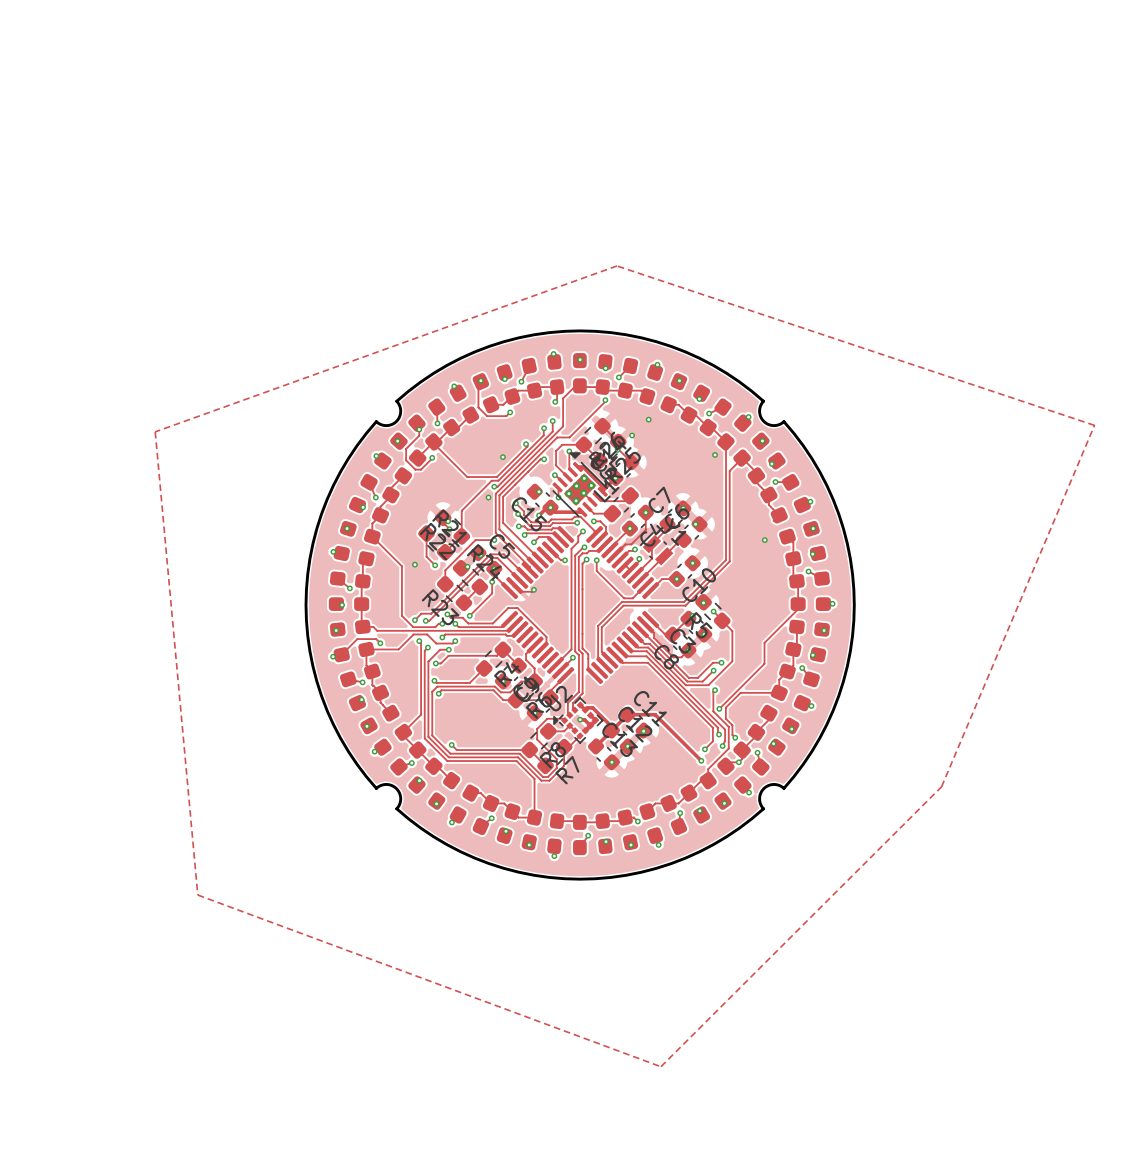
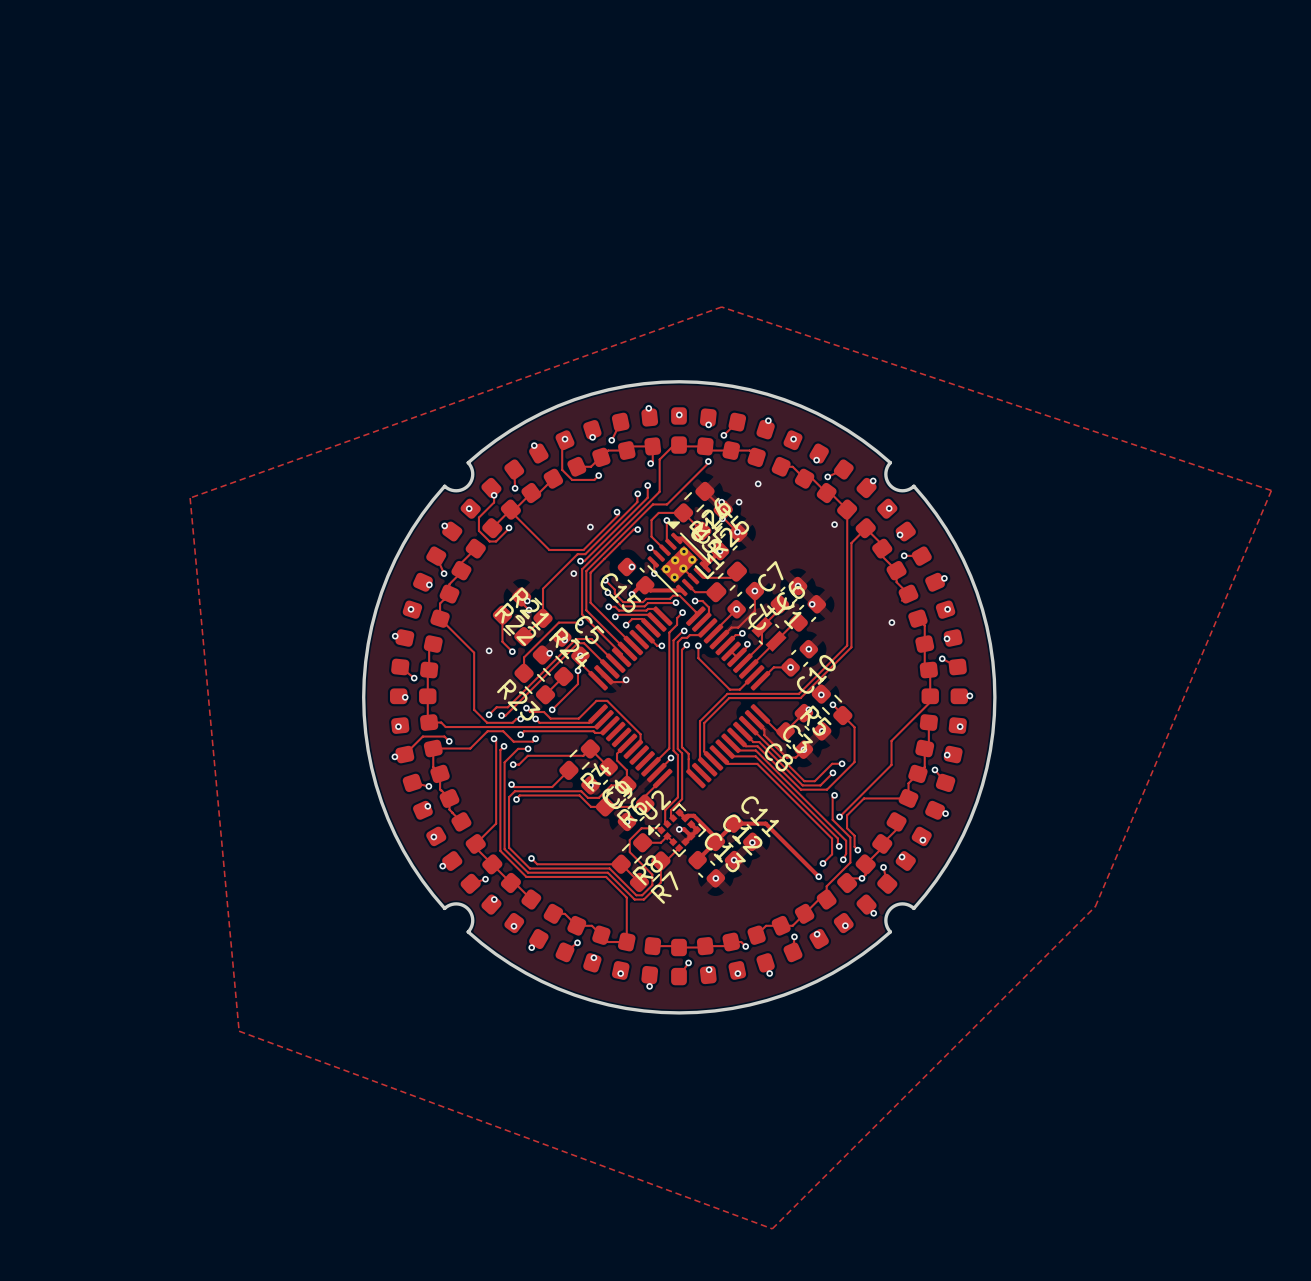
via: none -> (721, 502)
via: none -> (737, 532)
via: (550, 507) -> none

